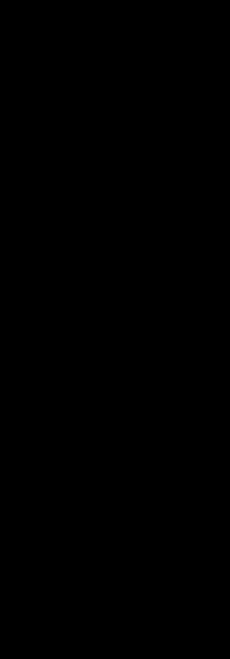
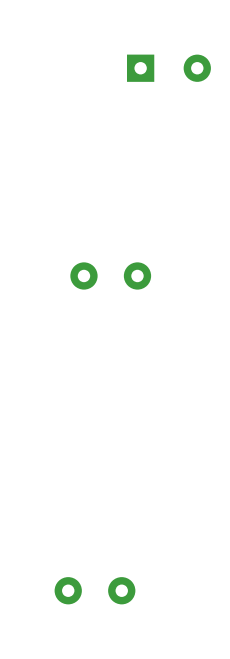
part: none -> (168, 68)
part: none -> (110, 275)
part: none -> (94, 590)

